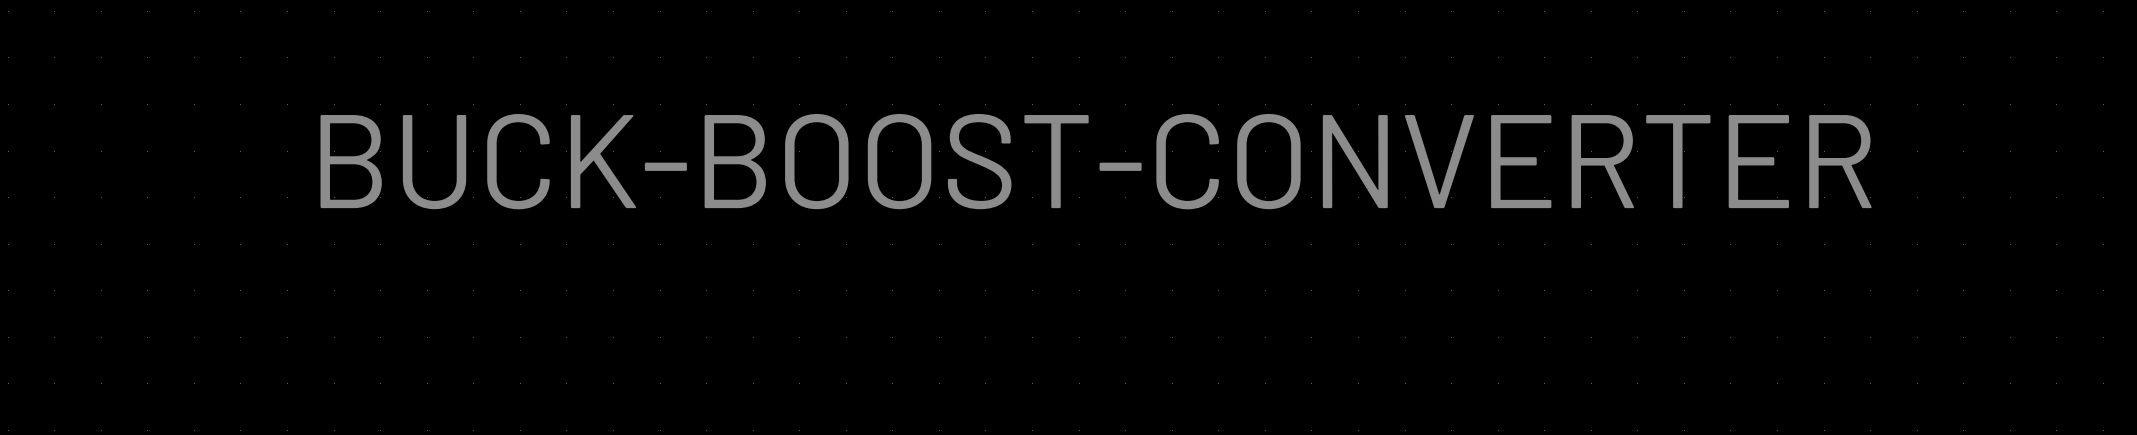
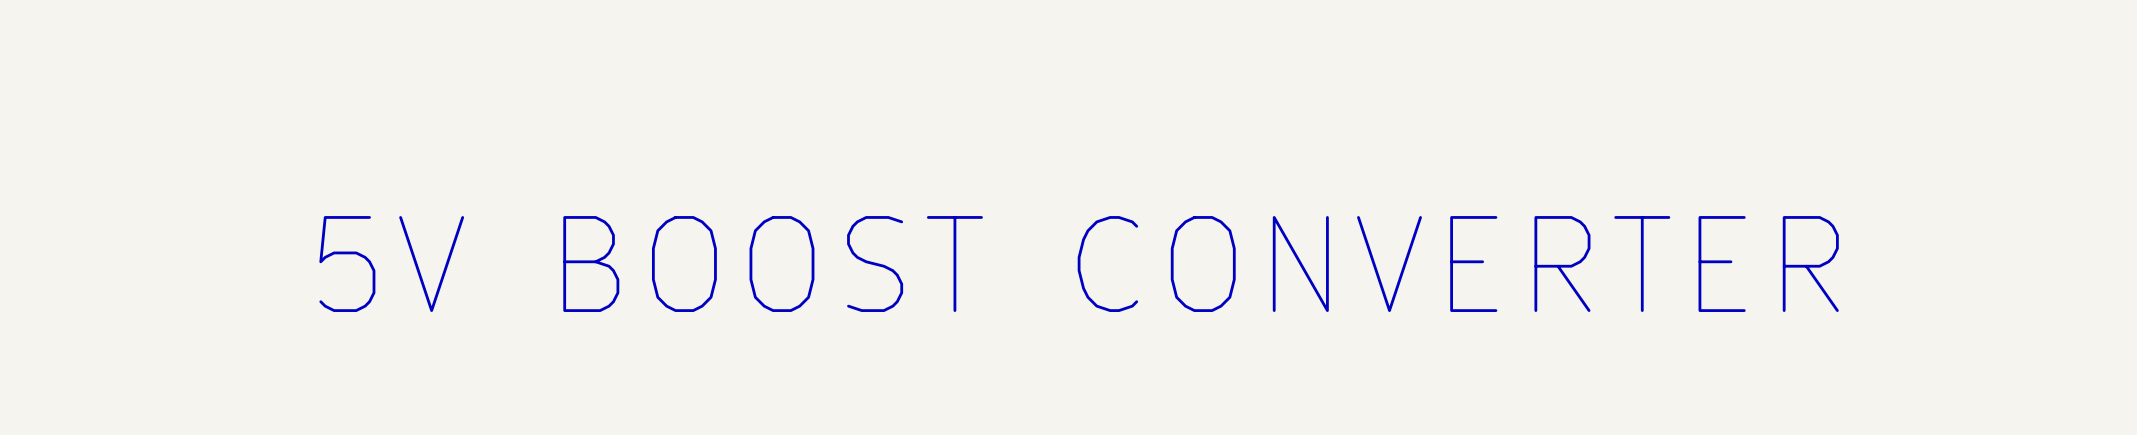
text: BUCK-BOOST-CONVERTER (1096, 161) -> 5V BOOST CONVERTER (1079, 264)

